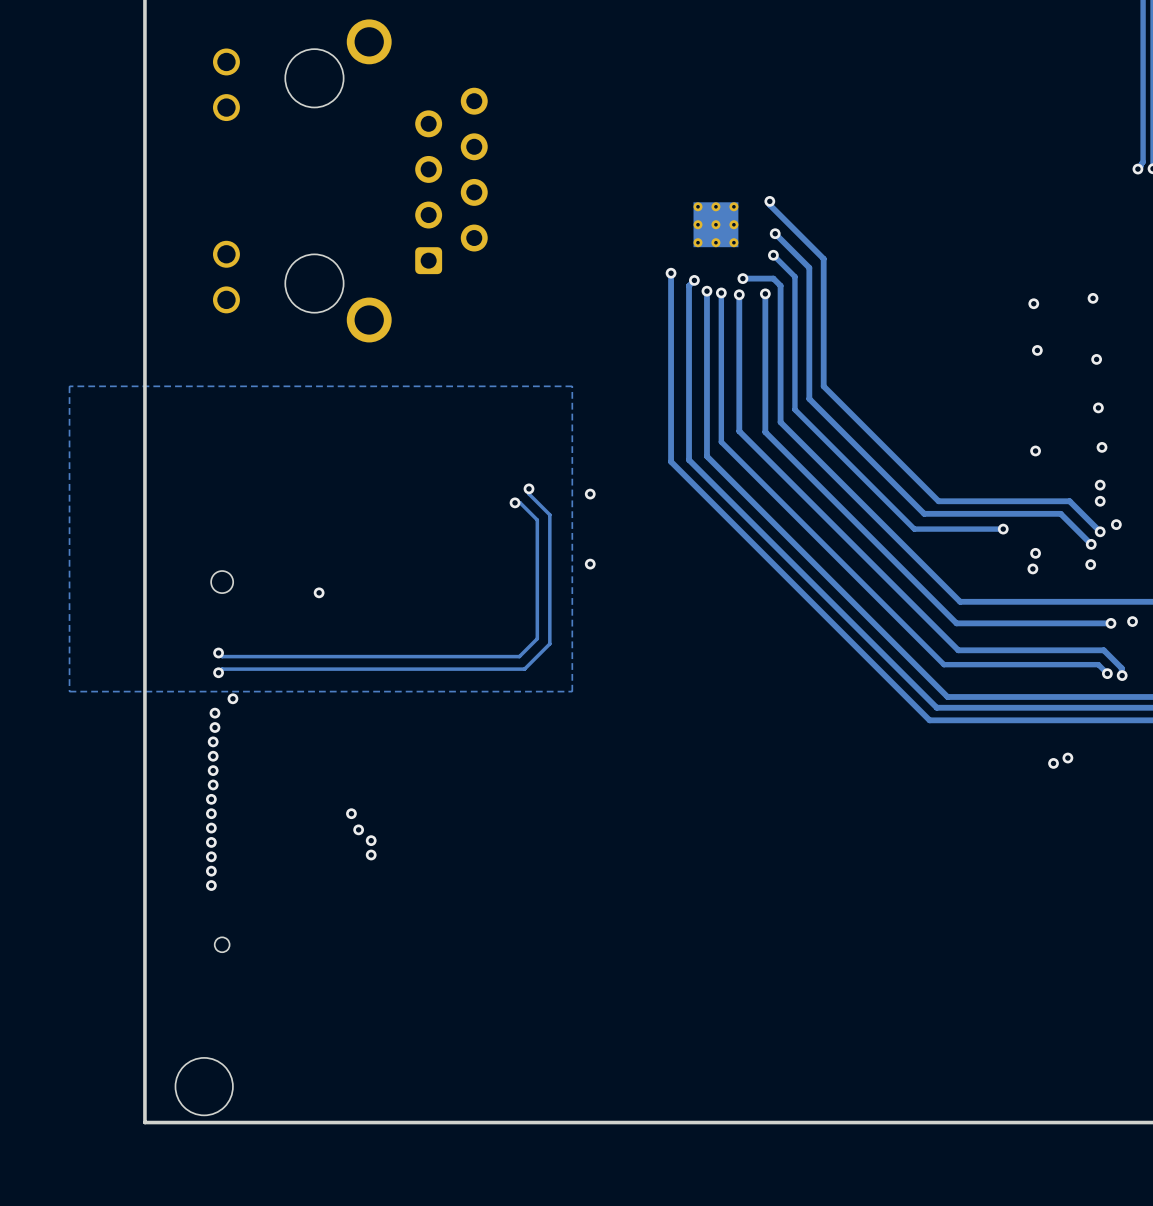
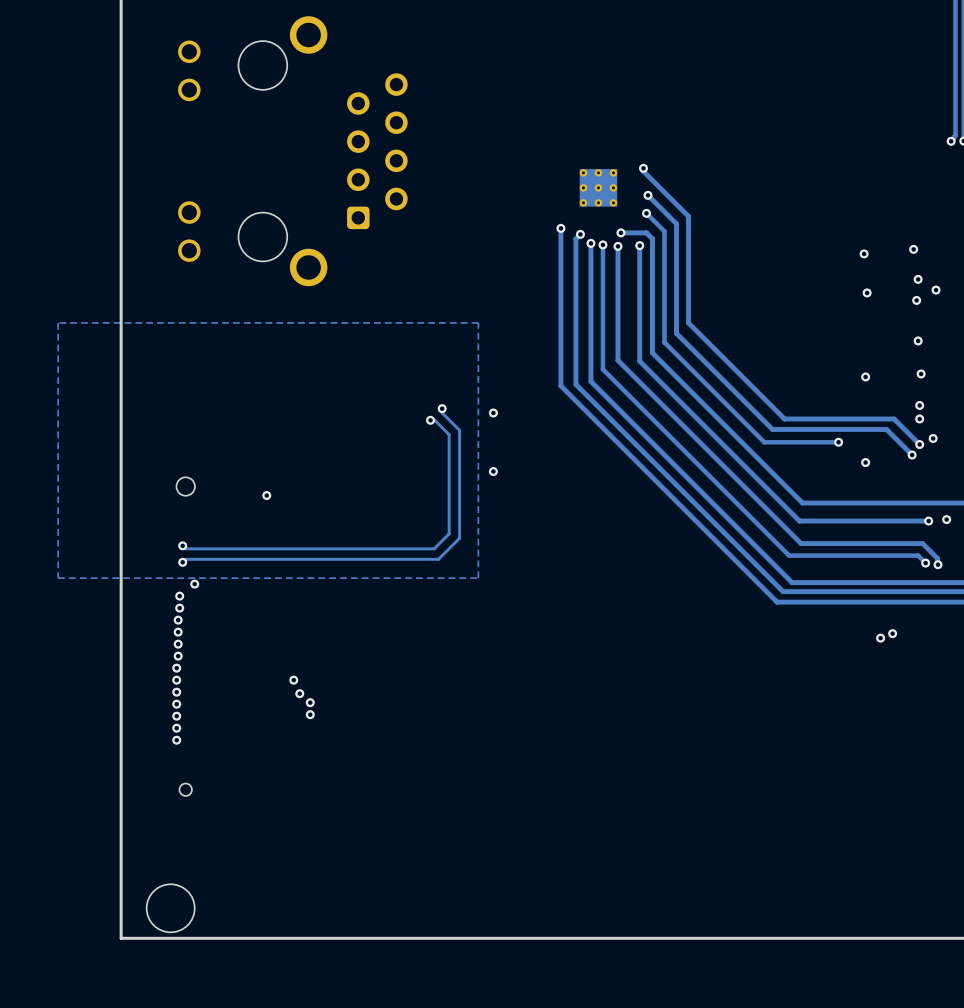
via: none -> (918, 279)
via: none -> (936, 290)
via: (1090, 564) -> none
via: (1032, 568) -> none

